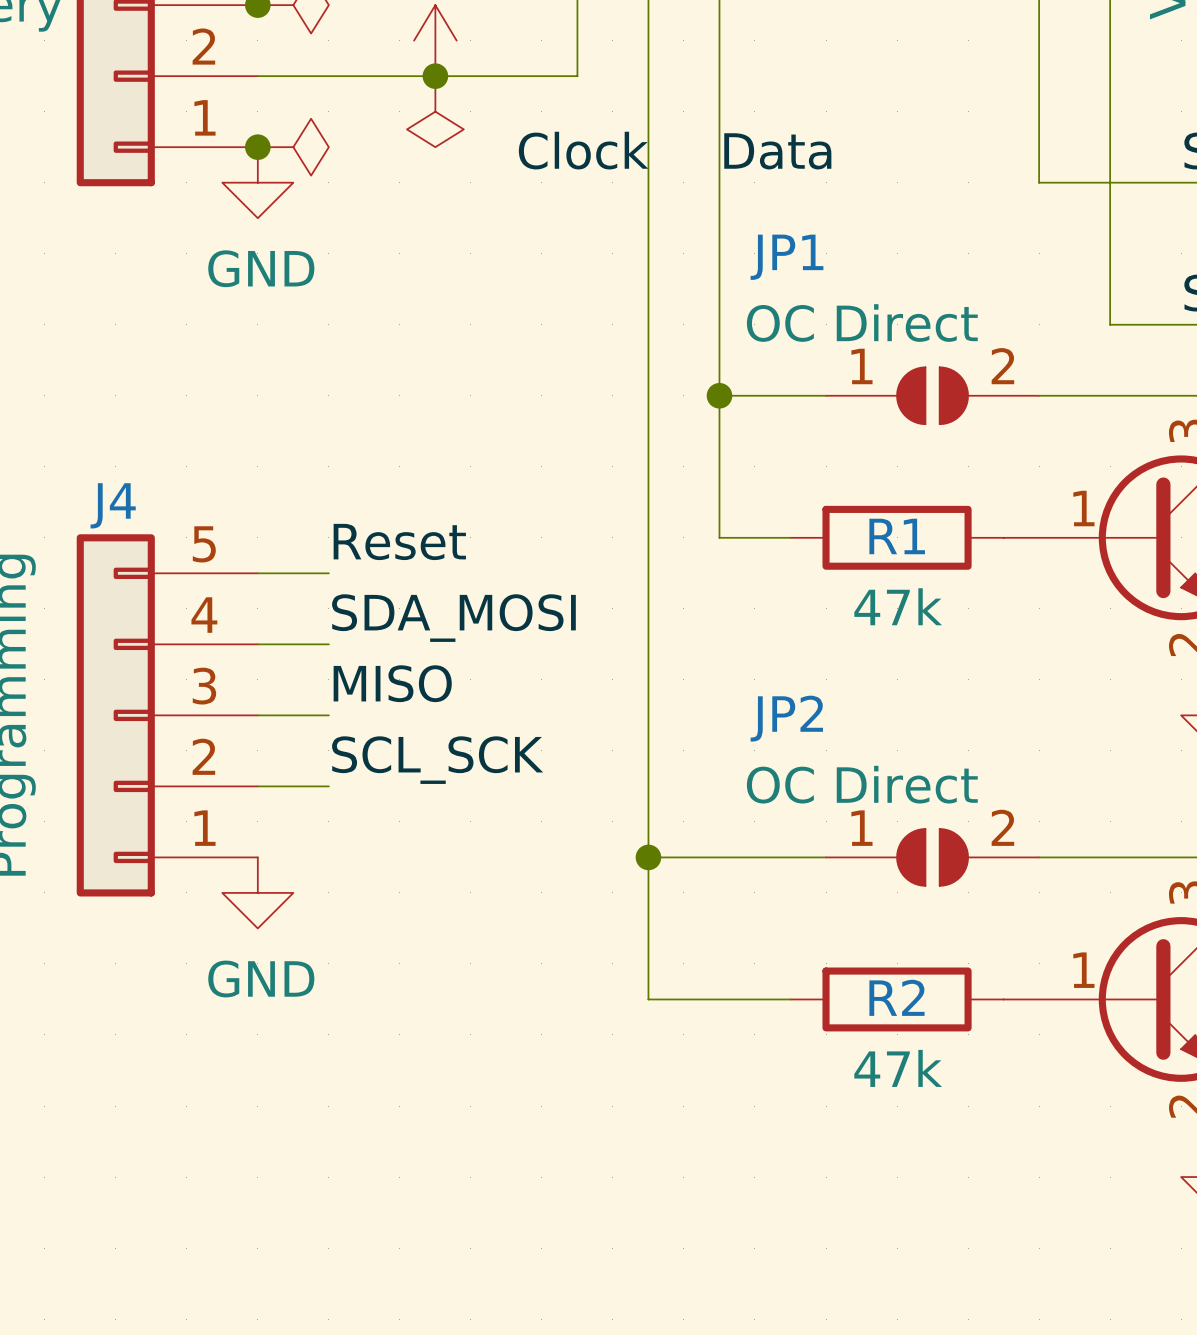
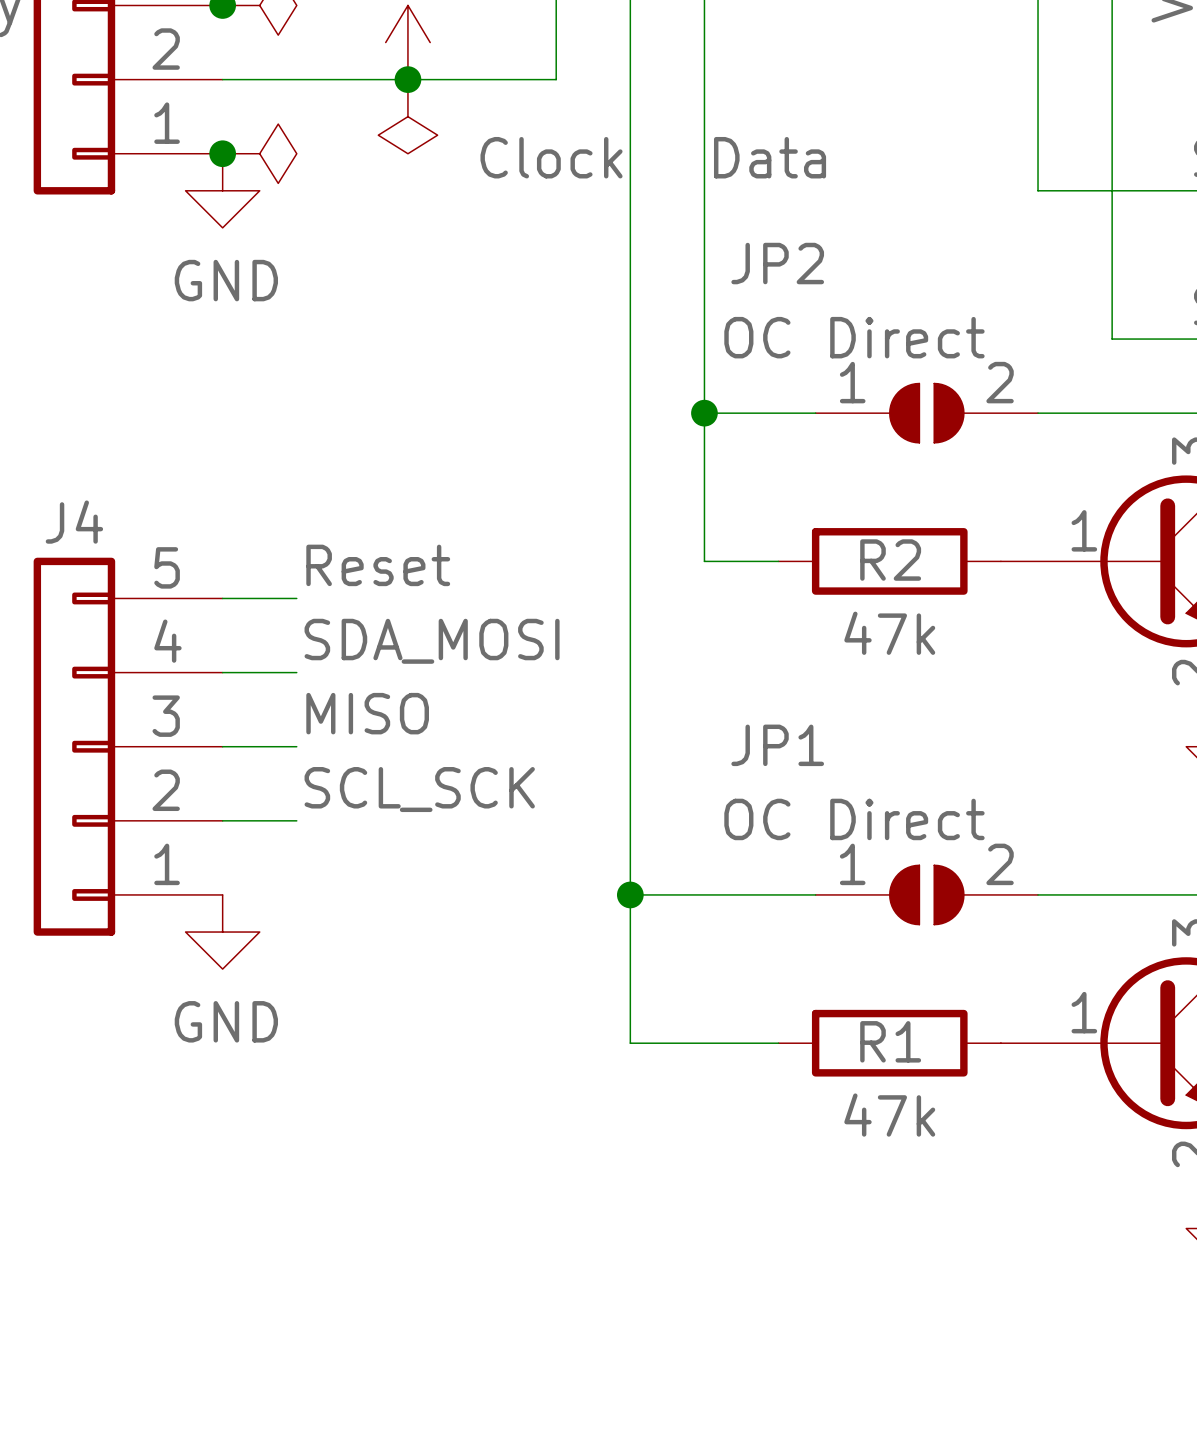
JP1 name: JP1 (787, 257) -> JP2 (777, 263)
R1 name: R1 (897, 536) -> R2 (890, 560)
JP2 name: JP2 (786, 718) -> JP1 (777, 745)
R2 name: R2 (896, 997) -> R1 (890, 1041)

